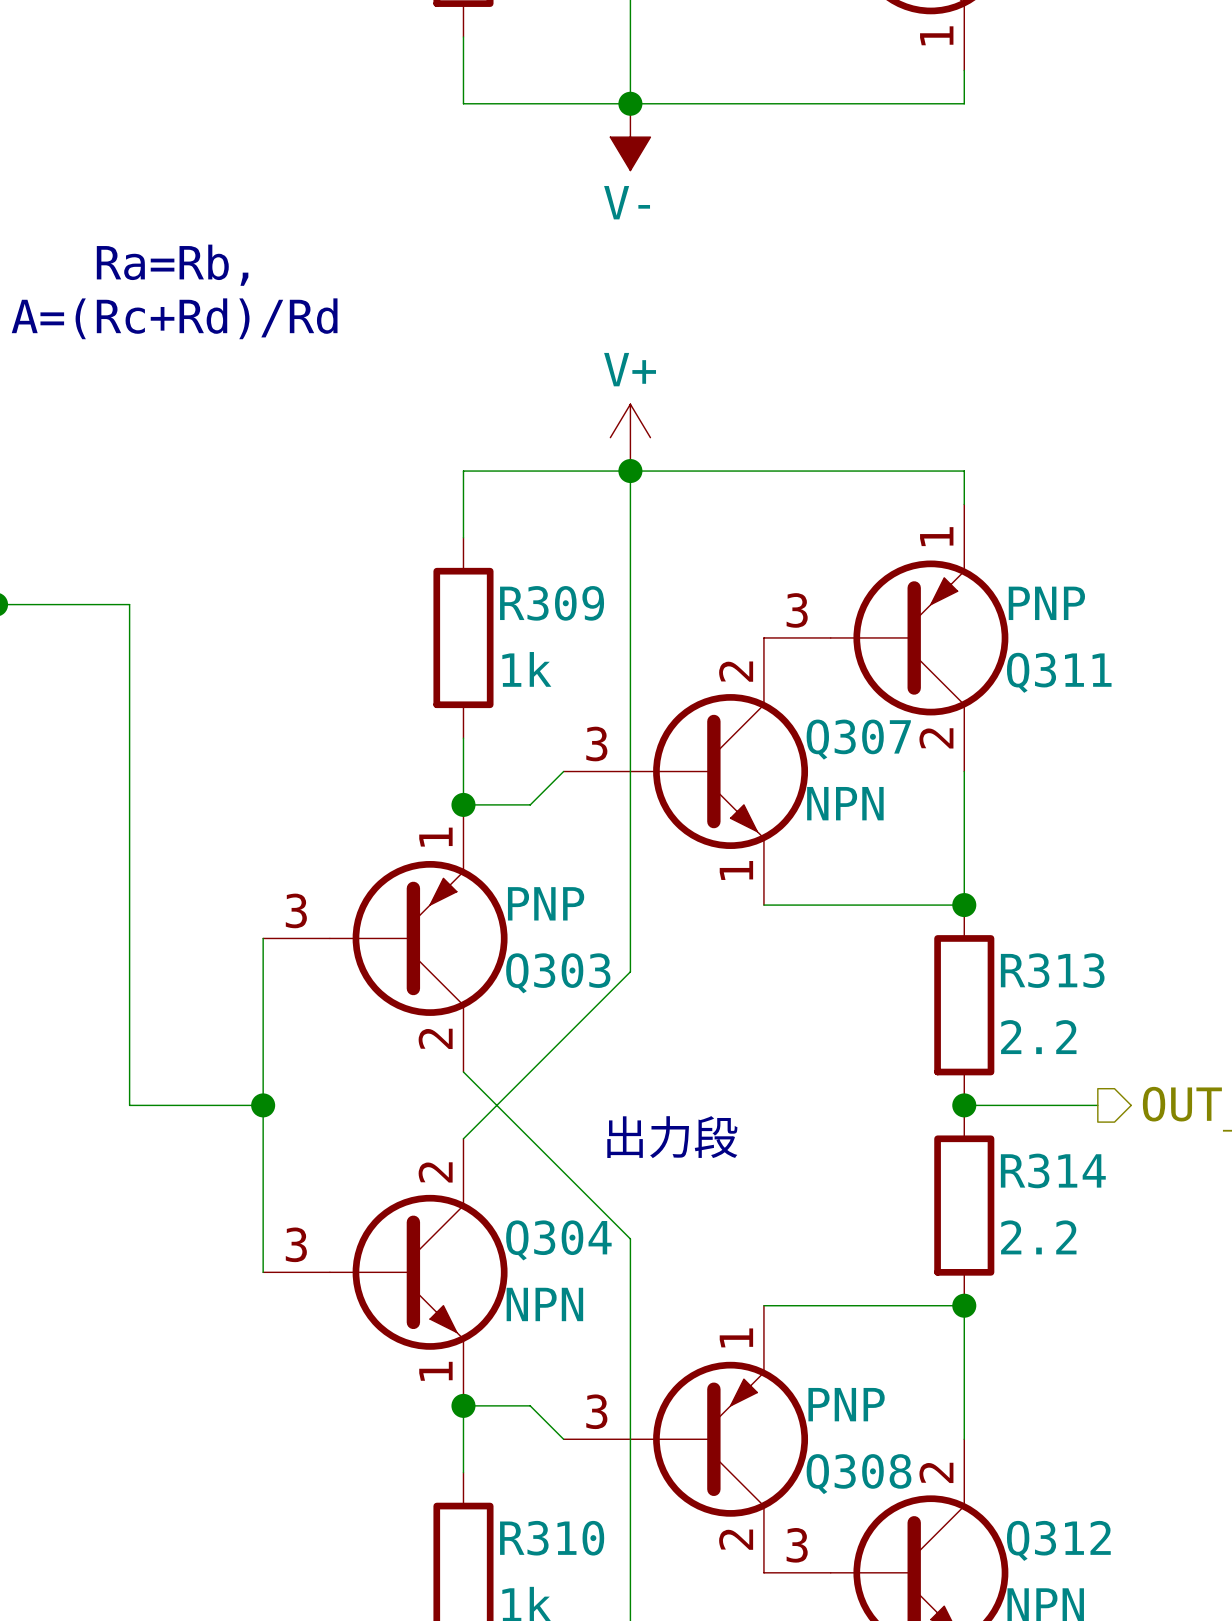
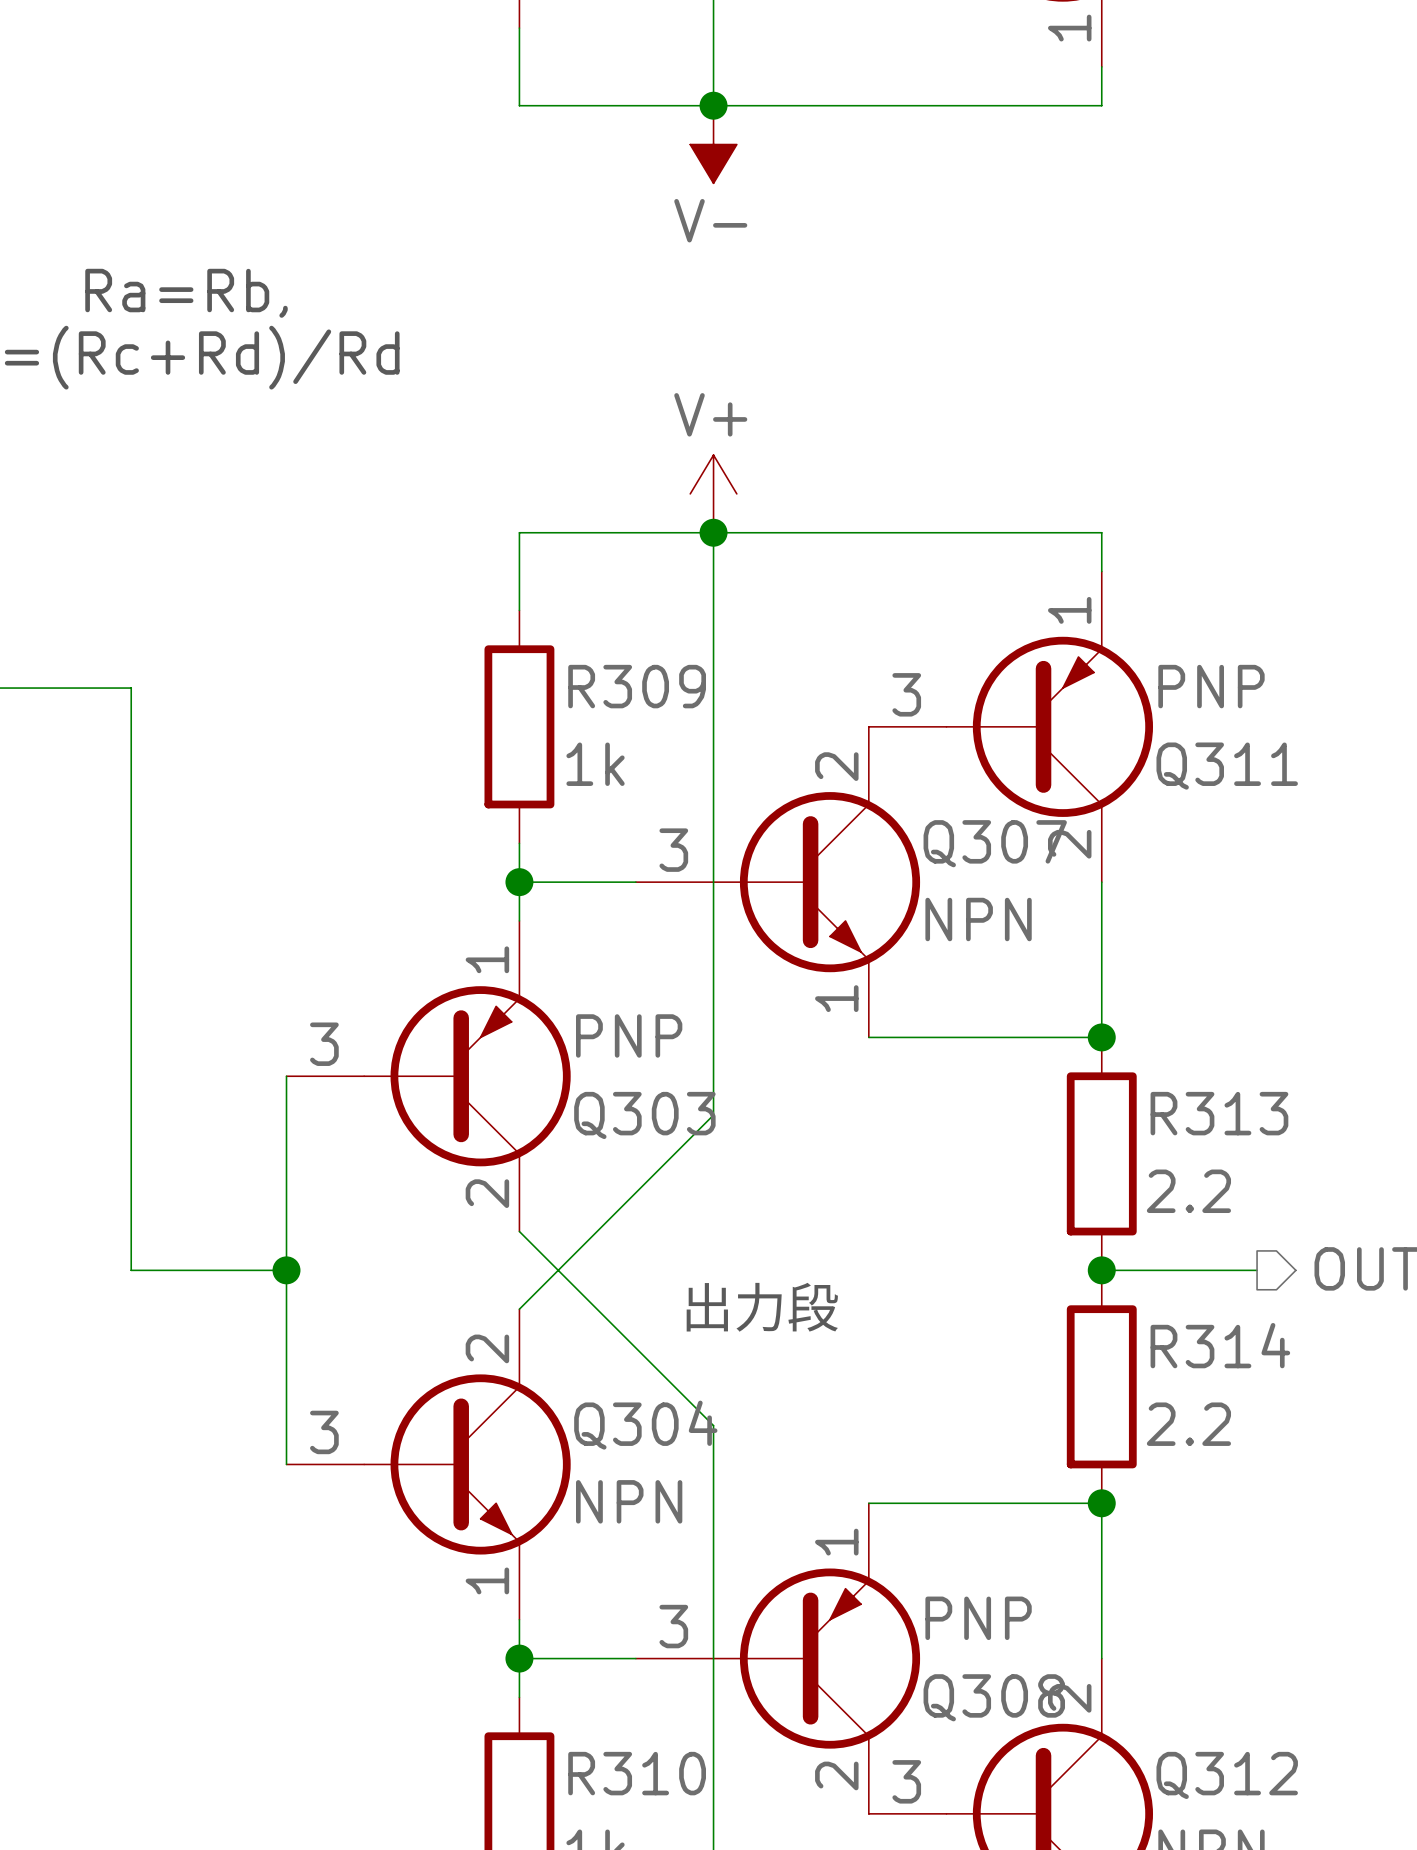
wire: (563, 771) (530, 804) (463, 804) -> (635, 882) (519, 882)
junction position: (463, 804) -> (519, 882)
wire: (463, 1405) (530, 1405) (563, 1439) -> (519, 1658) (635, 1658)
junction position: (463, 1405) -> (519, 1658)

